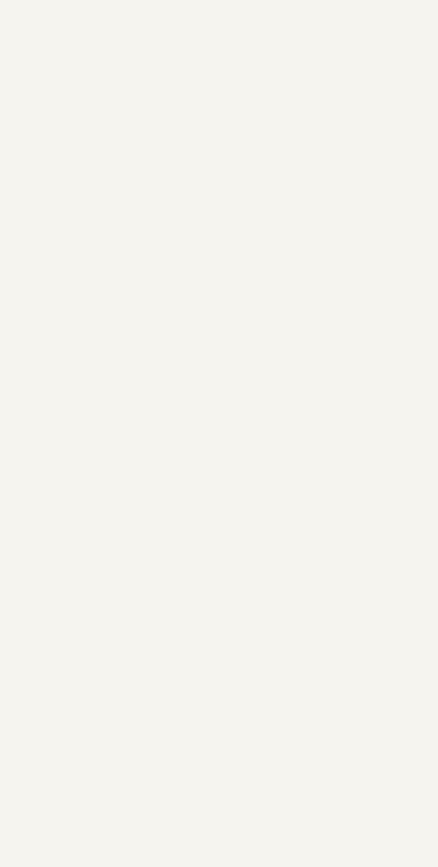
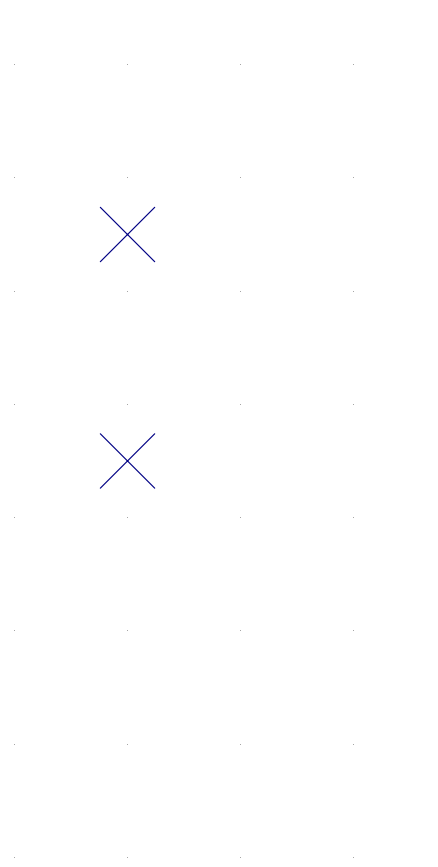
no-connect mark: none -> (127, 234)
no-connect mark: none -> (127, 460)

